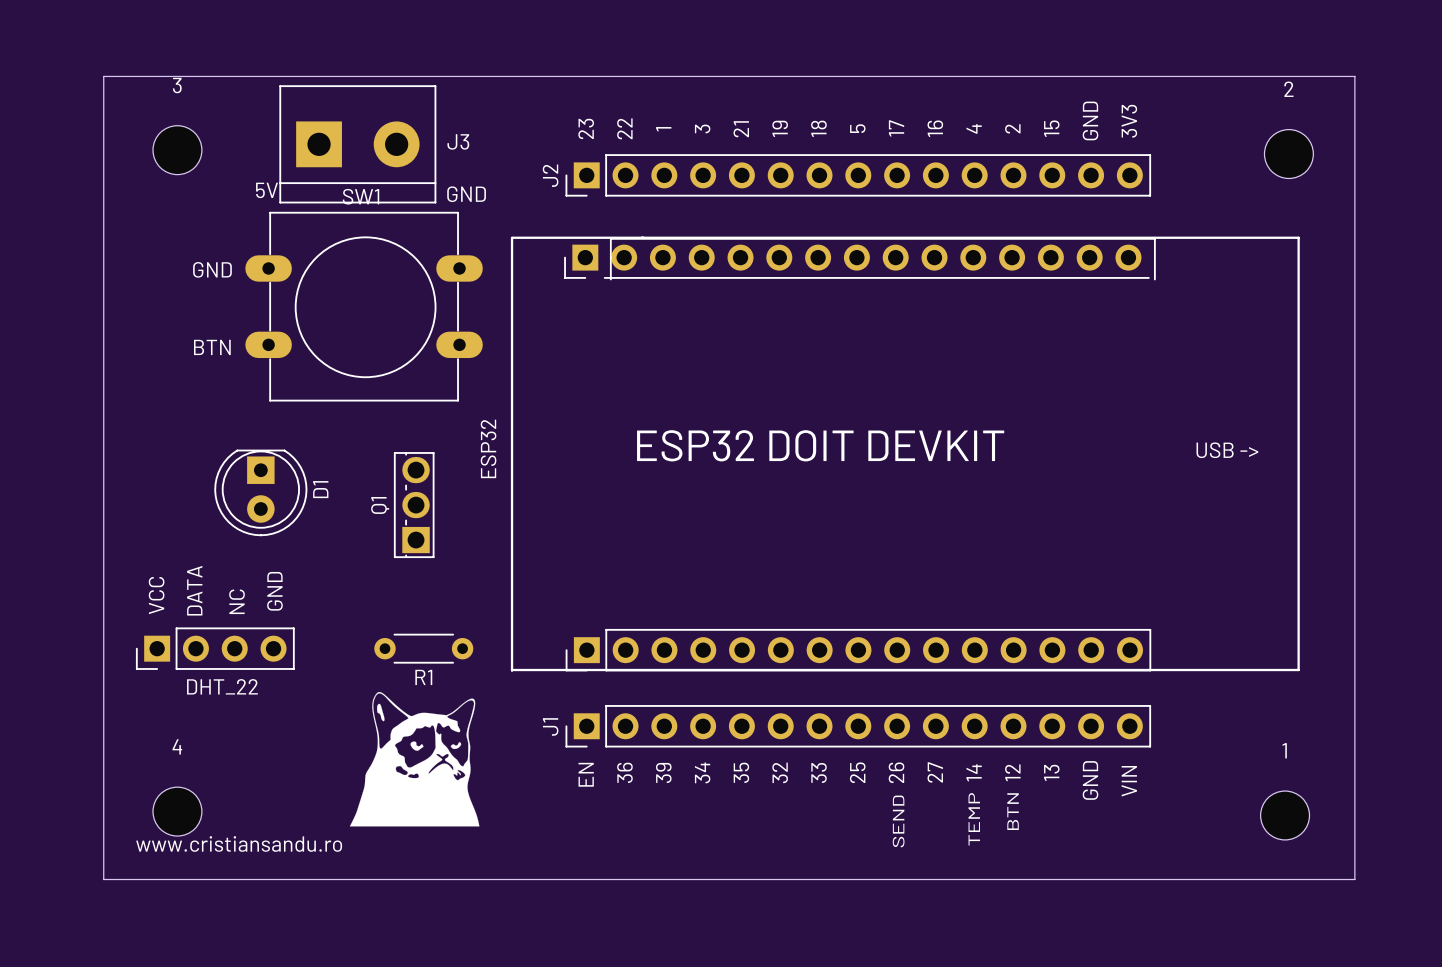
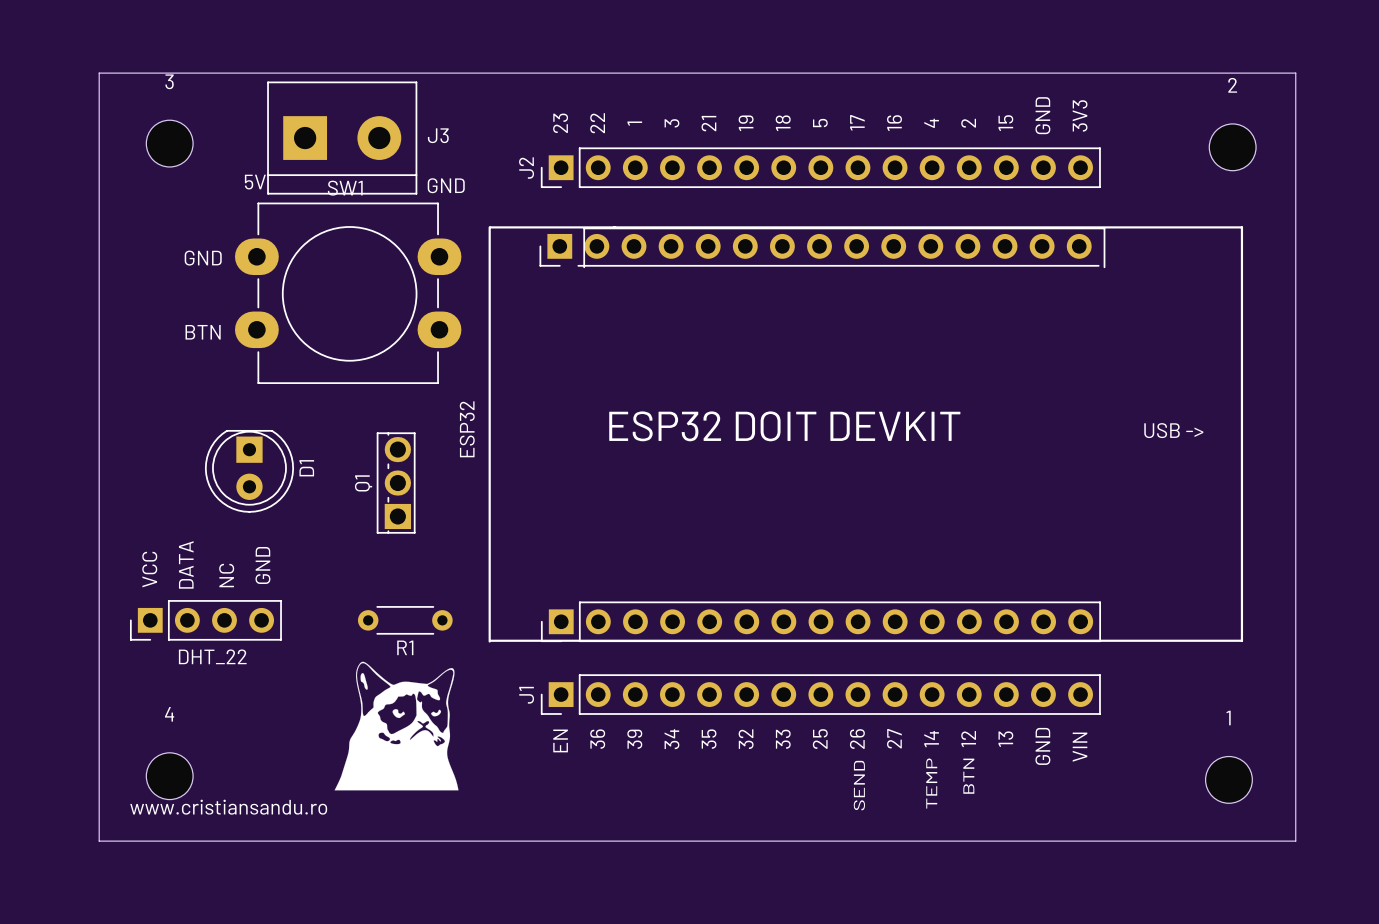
SW1 footprint: [245, 211, 483, 402] -> [234, 202, 462, 384]

